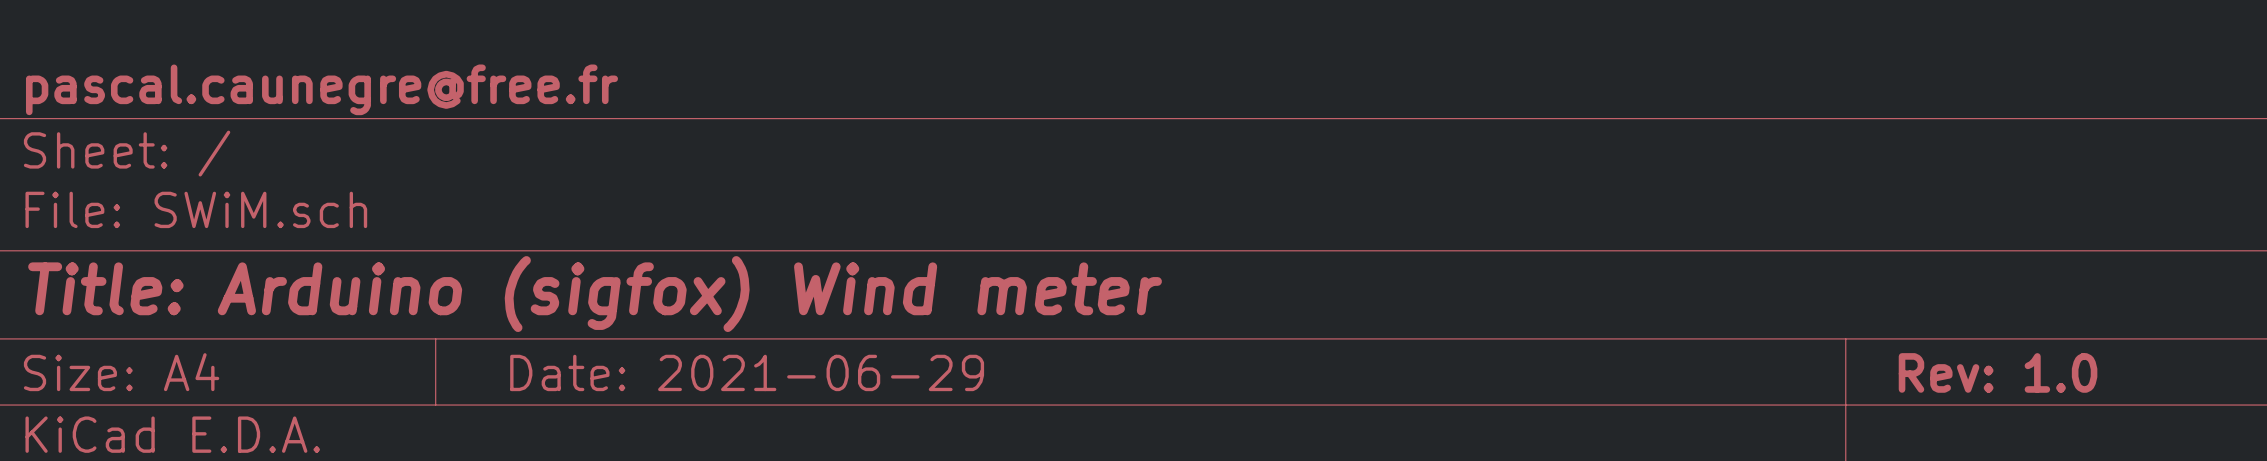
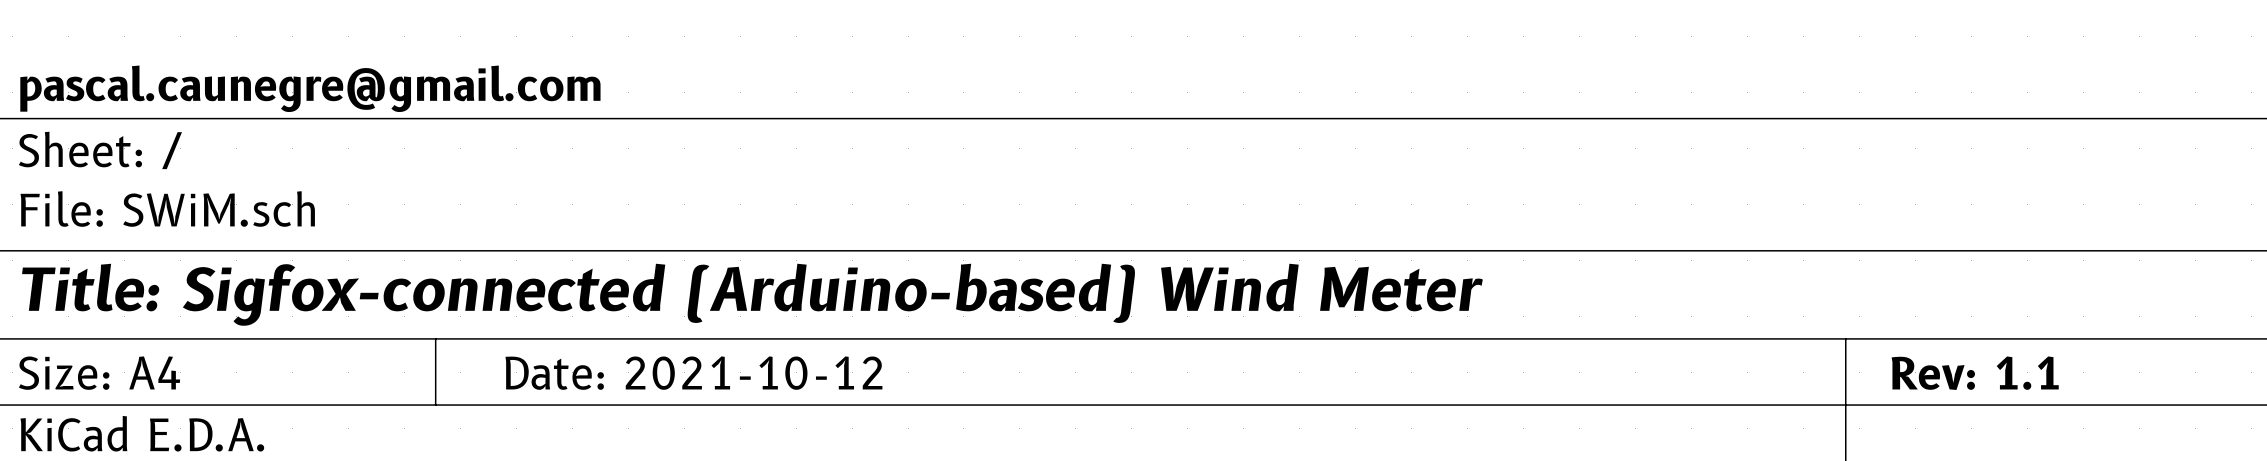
title block: pascal.caunegre@free.fr (322, 89) -> pascal.caunegre@gmail.com (310, 88)
title block: Title: Arduino (sigfox) Wind meter (595, 294) -> Title: Sigfox-connected (Arduino-based) Wind Meter (752, 294)
title block: Date: 2021-06-29 (747, 372) -> Date: 2021-10-12 (693, 373)
title block: Rev: 1.0 (1998, 372) -> Rev: 1.1 (1975, 373)

